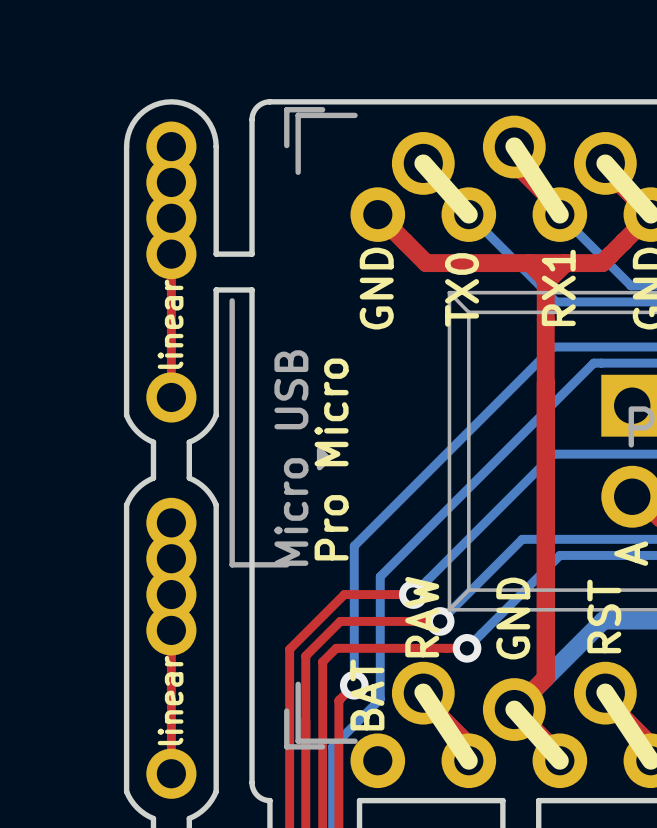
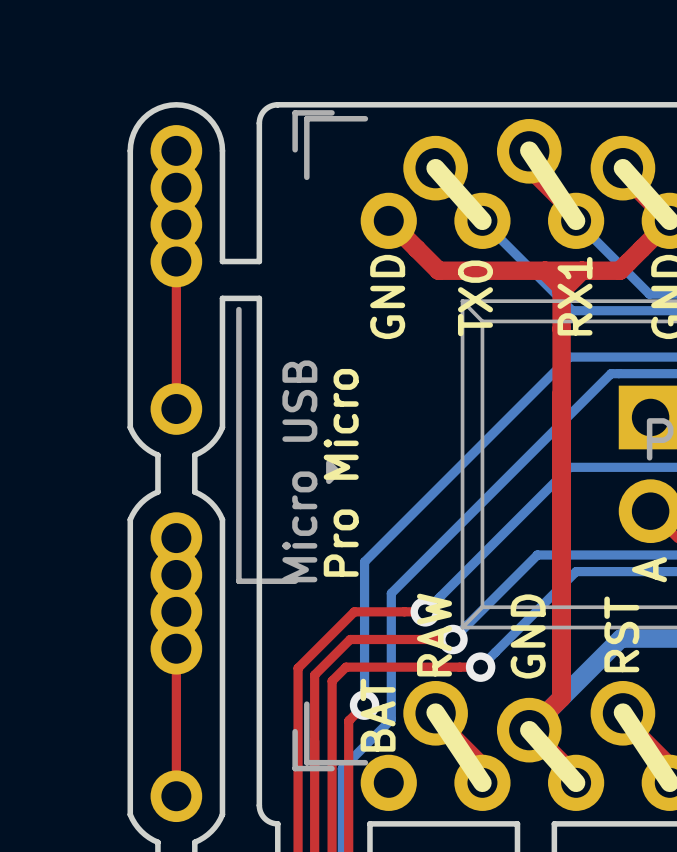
text: linear (170, 324) -> none
text: linear (170, 700) -> none

